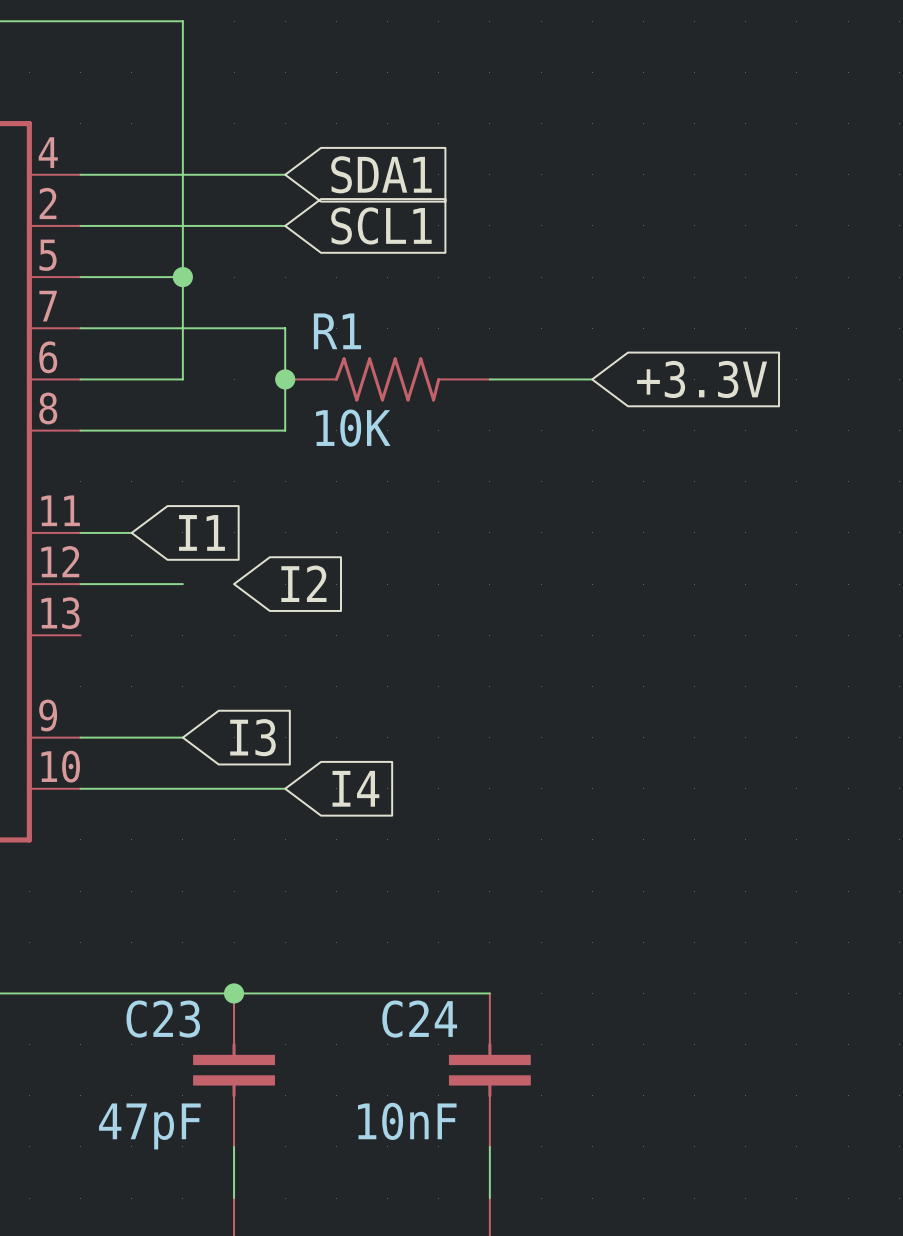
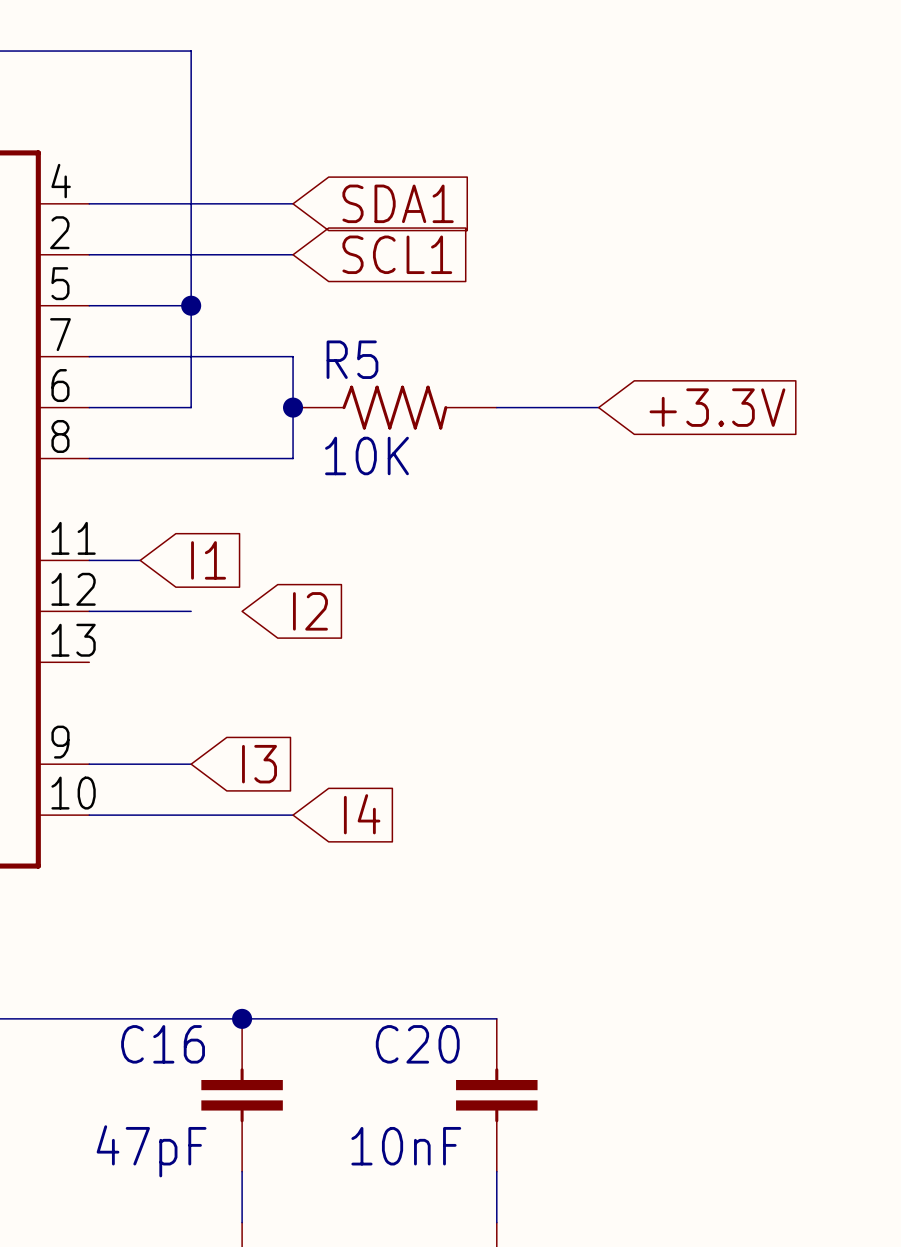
R1 name: R1 (337, 331) -> R5 (352, 359)
C23 name: C23 (163, 1019) -> C16 (163, 1044)
C24 name: C24 (419, 1019) -> C20 (417, 1044)

